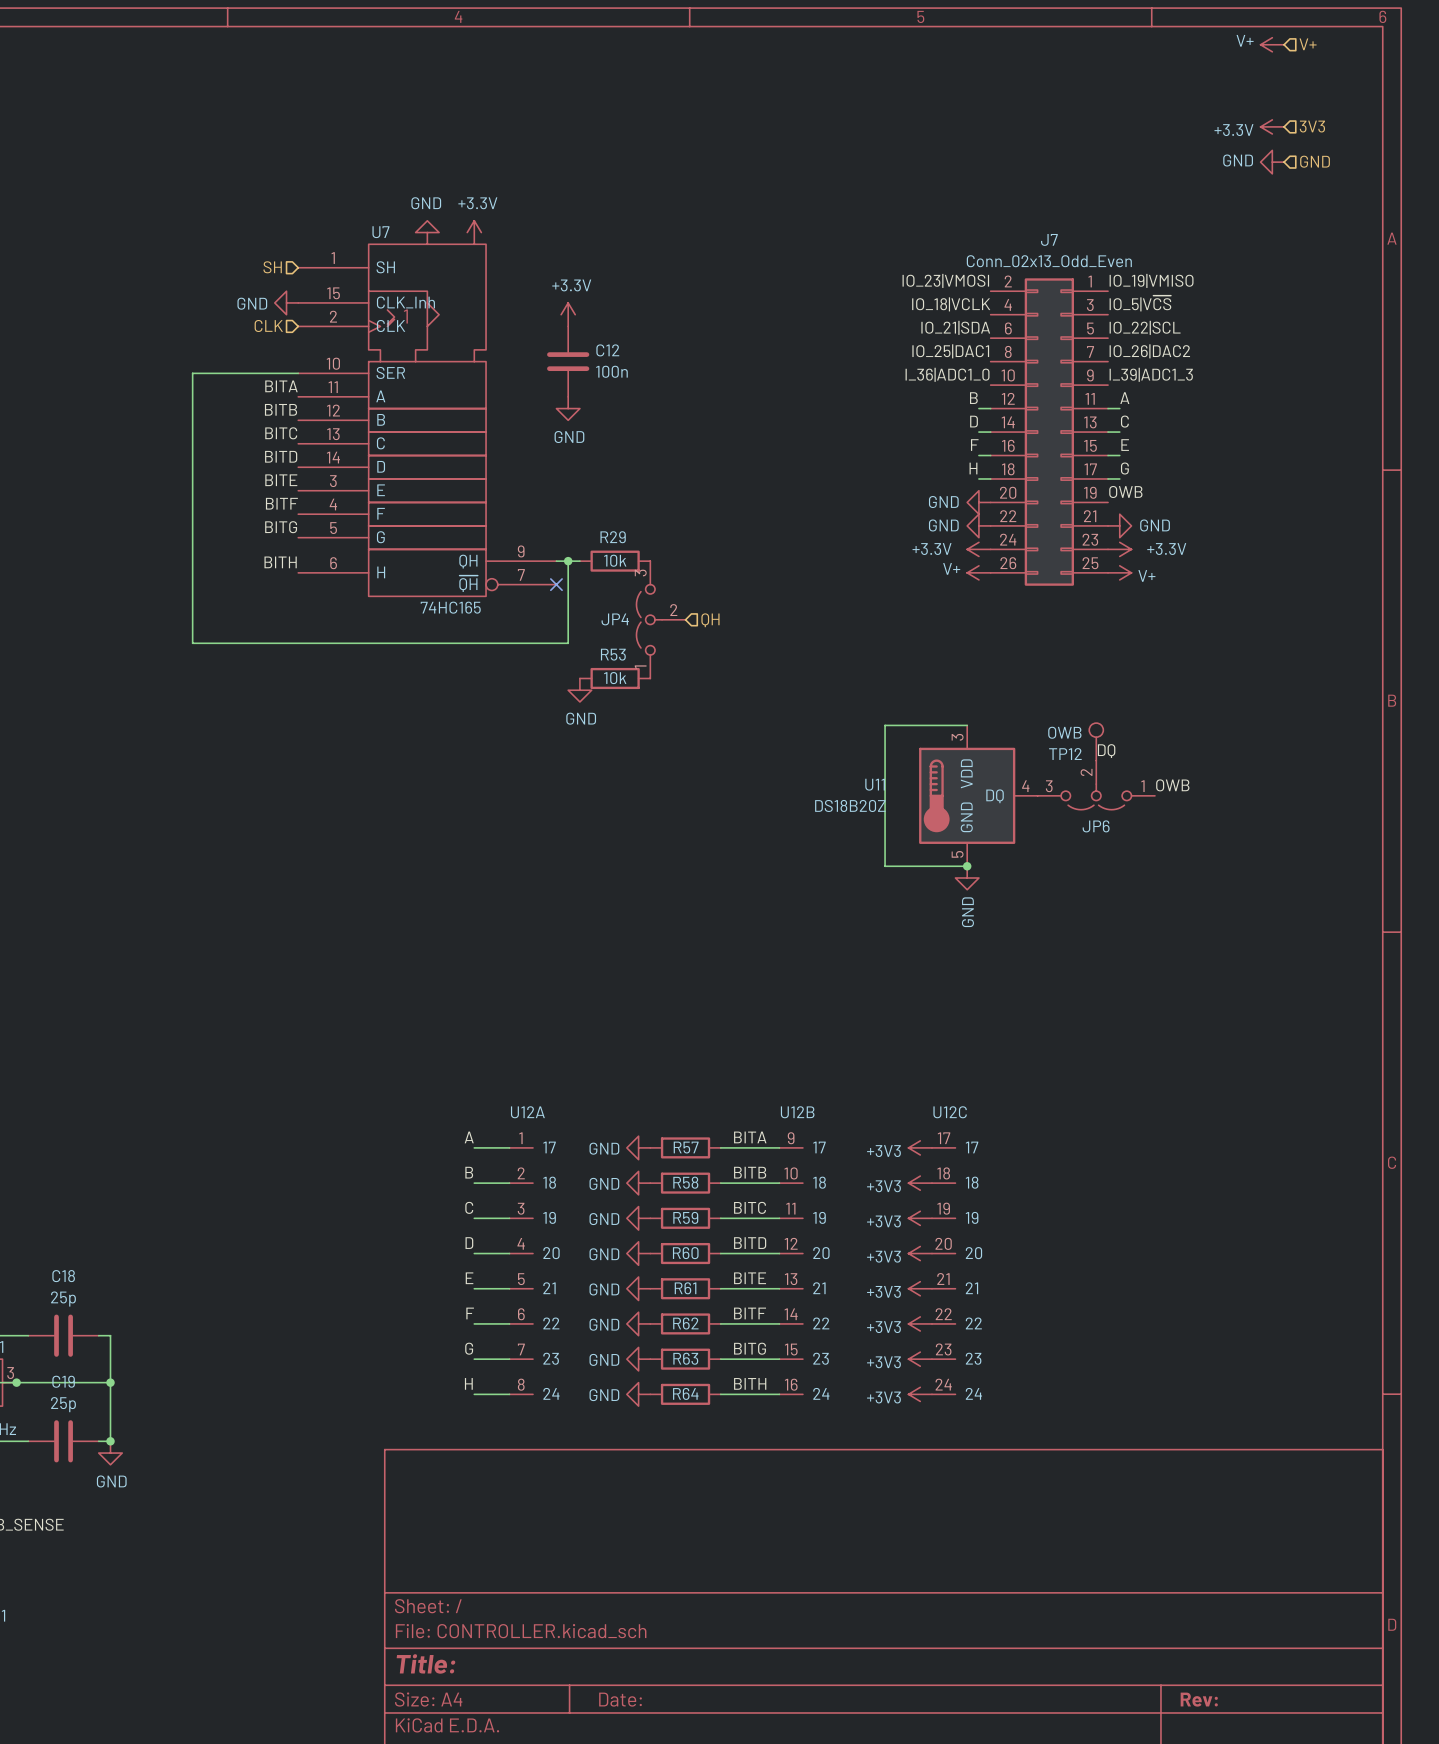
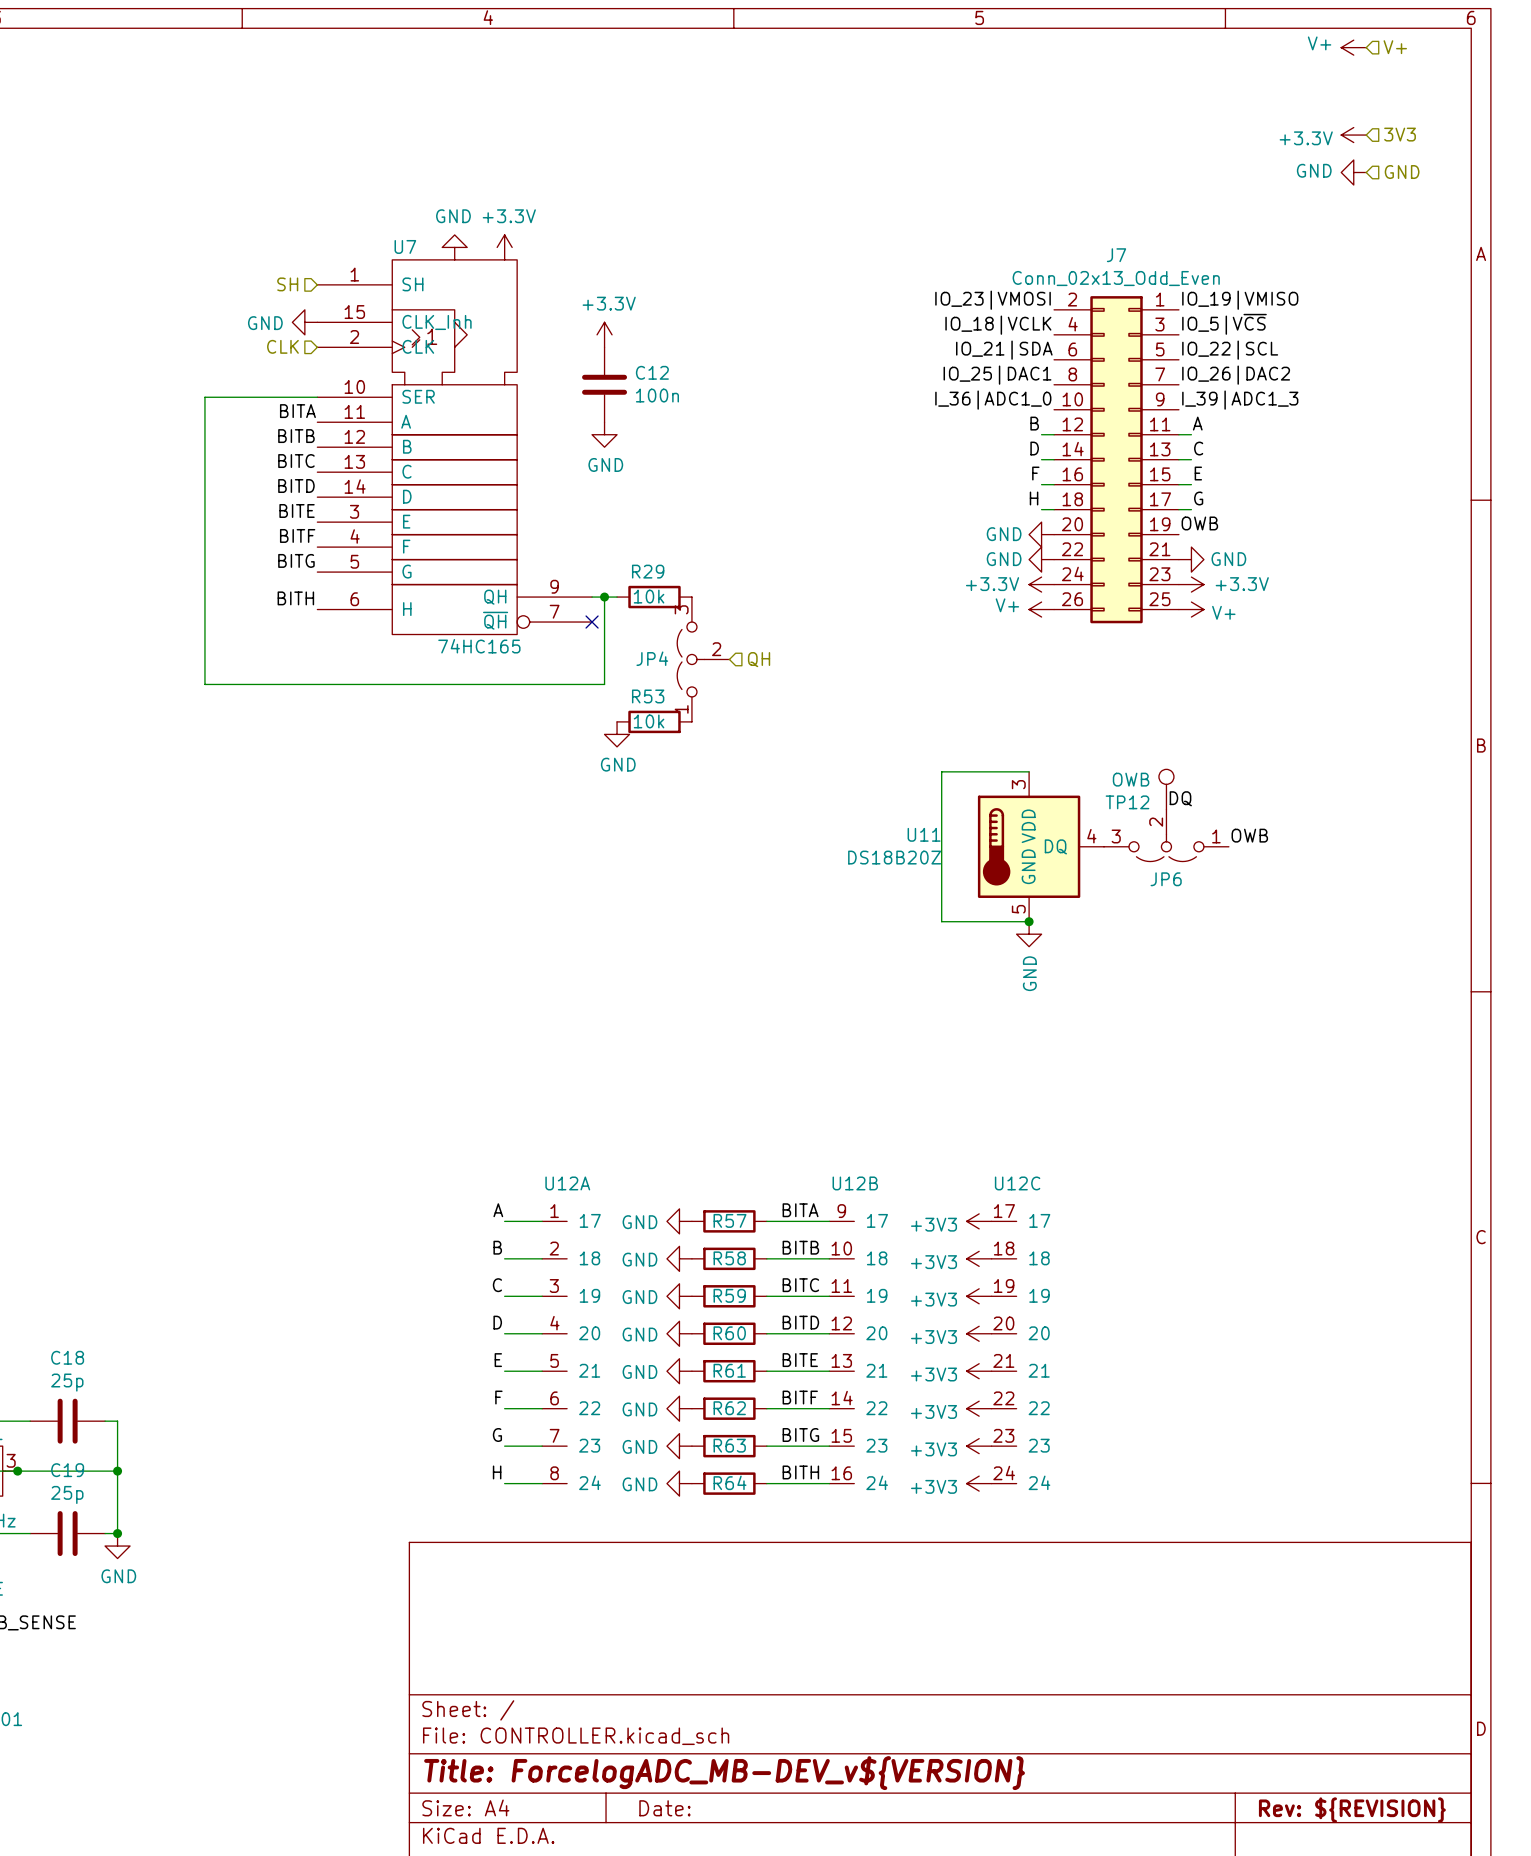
title block: Title: (426, 1663) -> Title: ForcelogADC_MB-DEV_v${VERSION} (724, 1773)
title block: Rev: (1199, 1699) -> Rev: ${REVISION} (1352, 1810)

